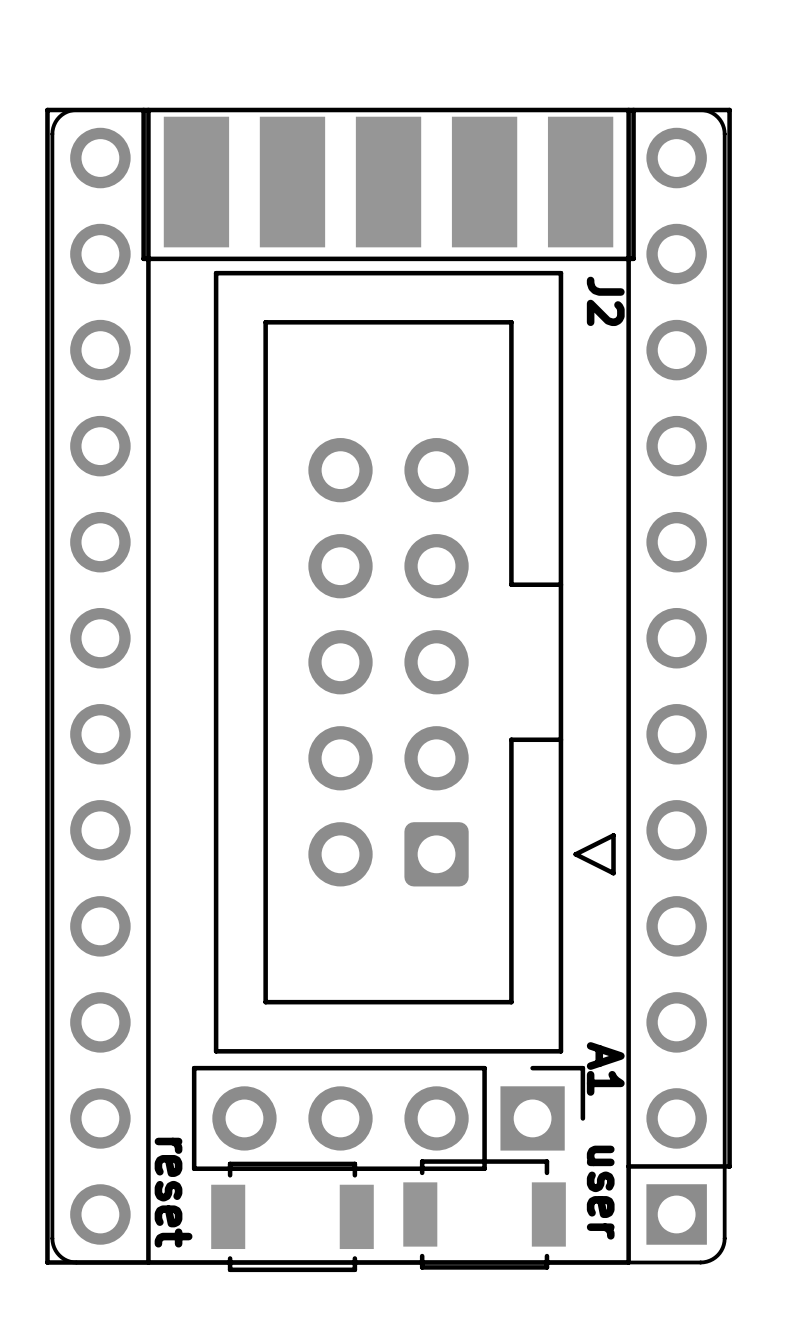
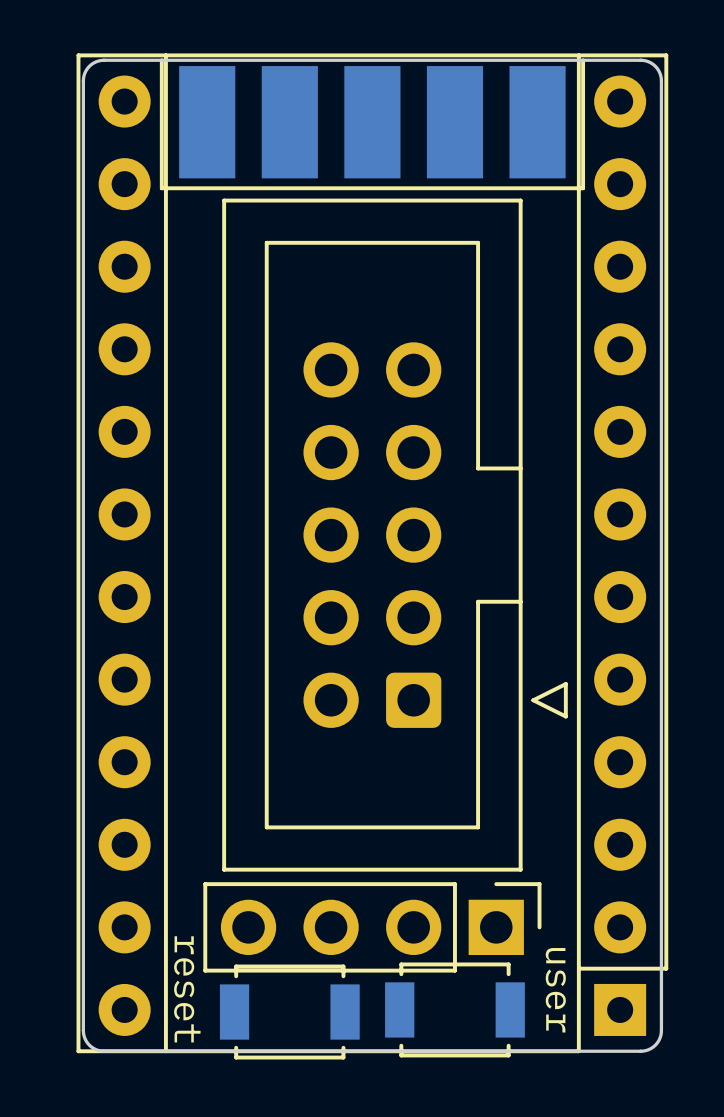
J2 name: J2 (605, 301) -> none
part: none -> (372, 553)
A1: (388, 686) -> none

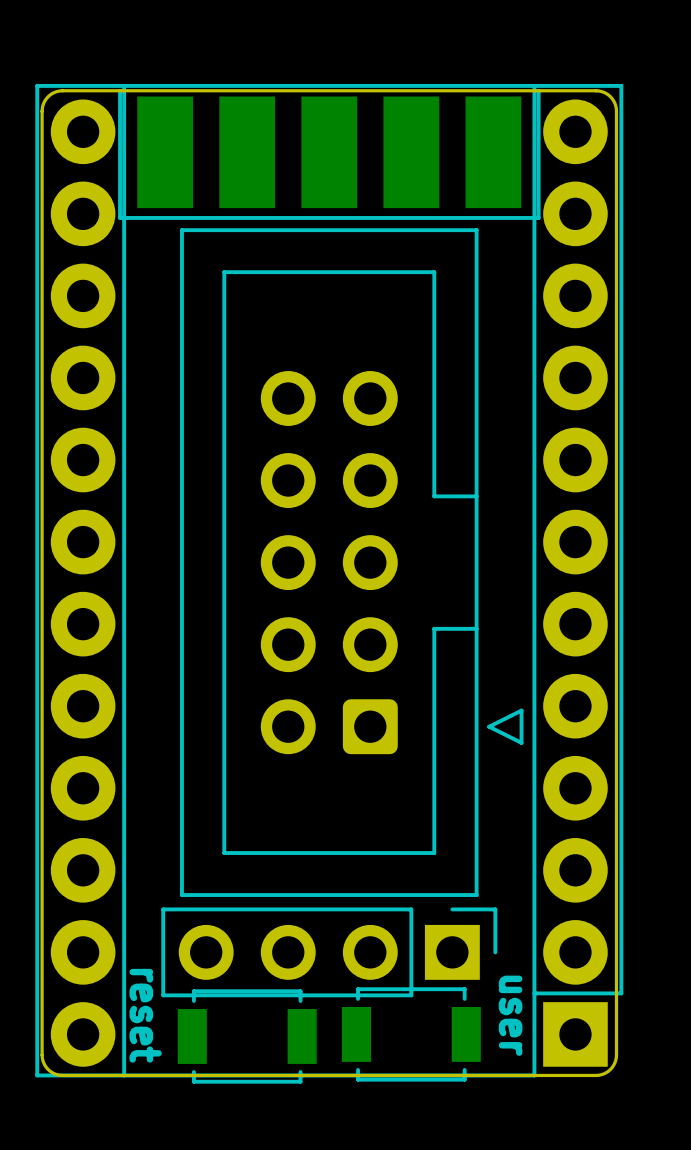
part footprint: [76, 53, 669, 1054] -> [35, 83, 624, 1078]

